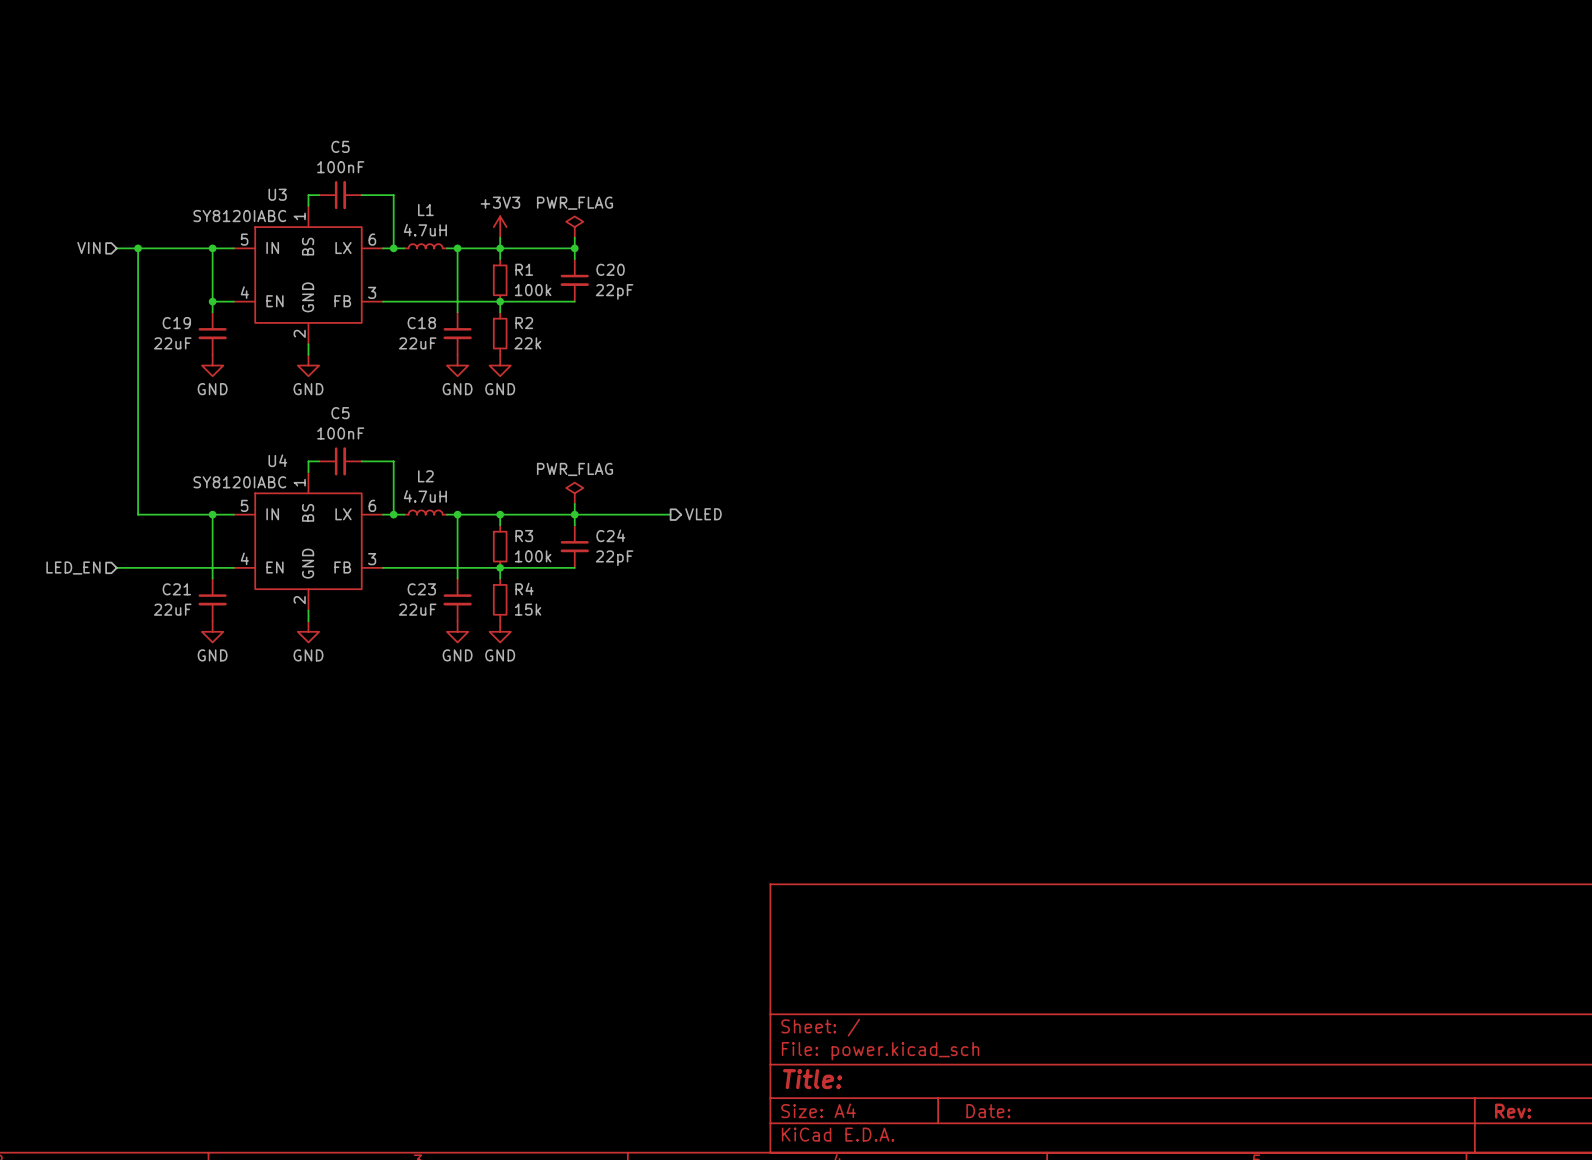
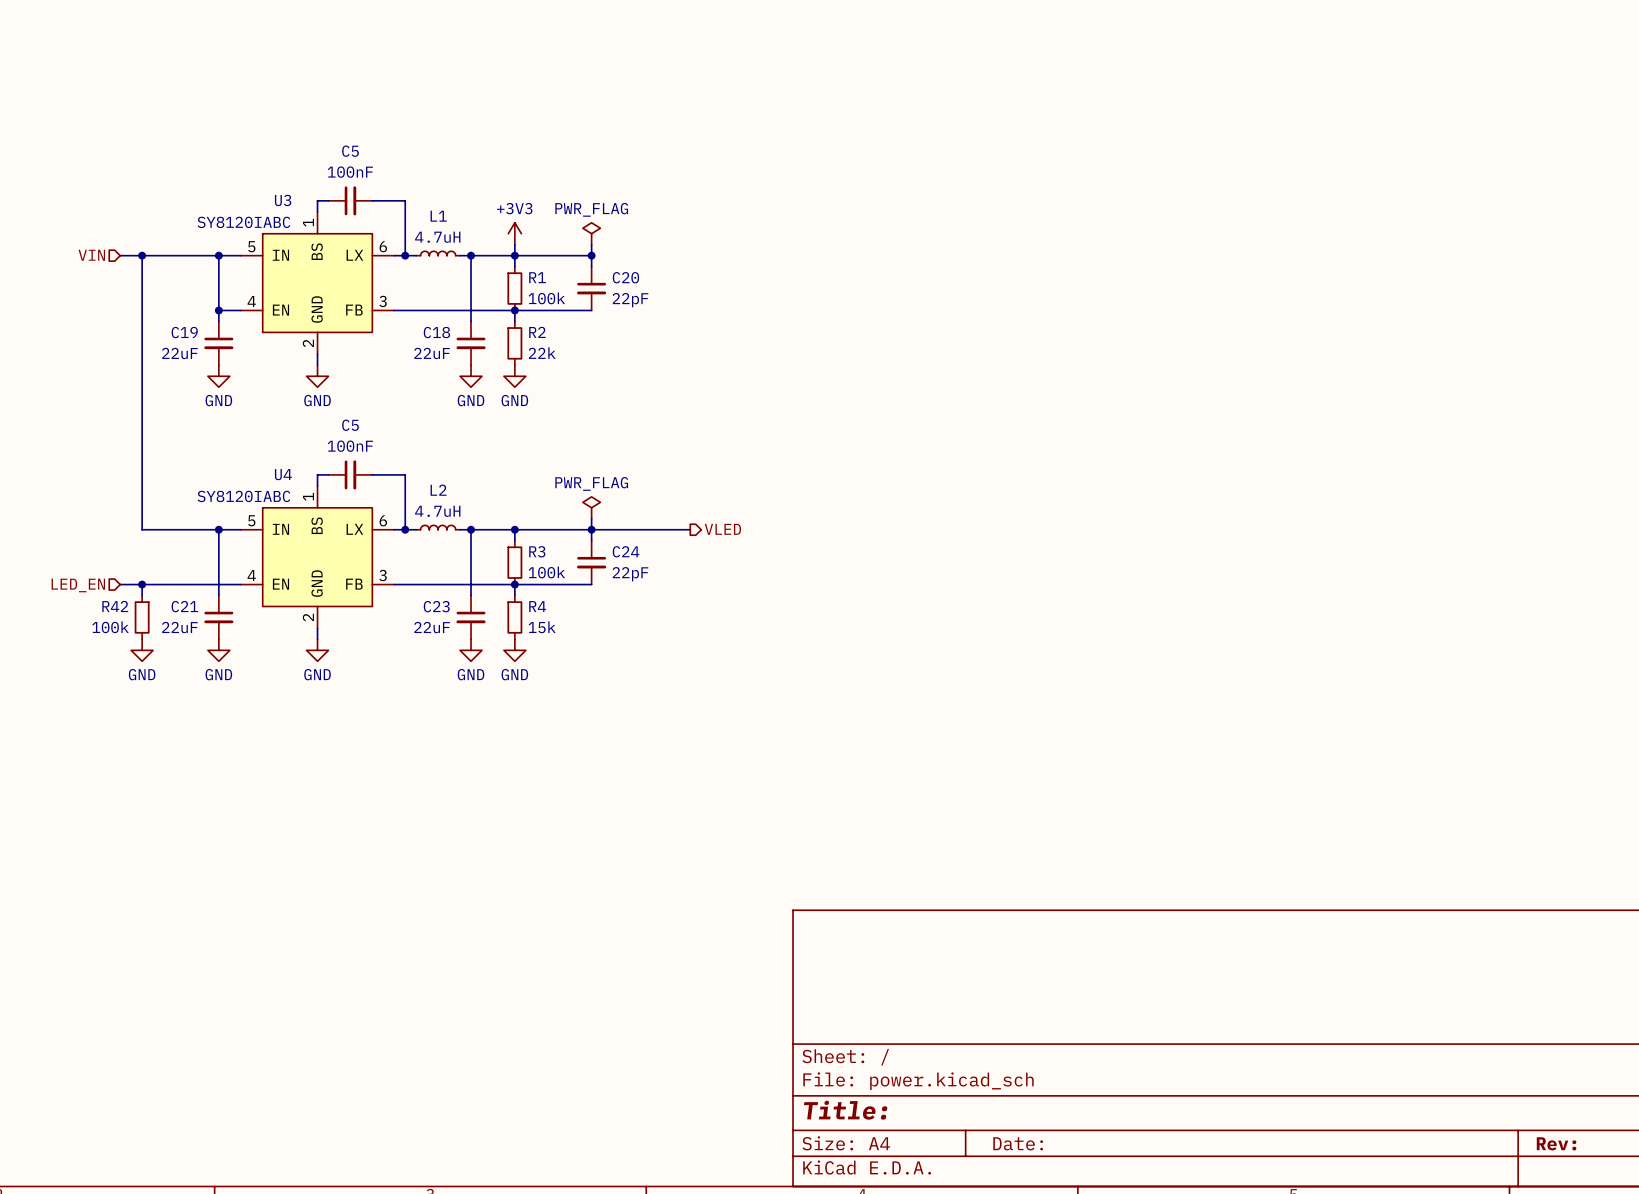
wire: none -> (142, 584) (142, 595)
junction: none -> (142, 584)
R42: none -> 100k (142, 617)
power symbol: none -> GND (142, 650)

